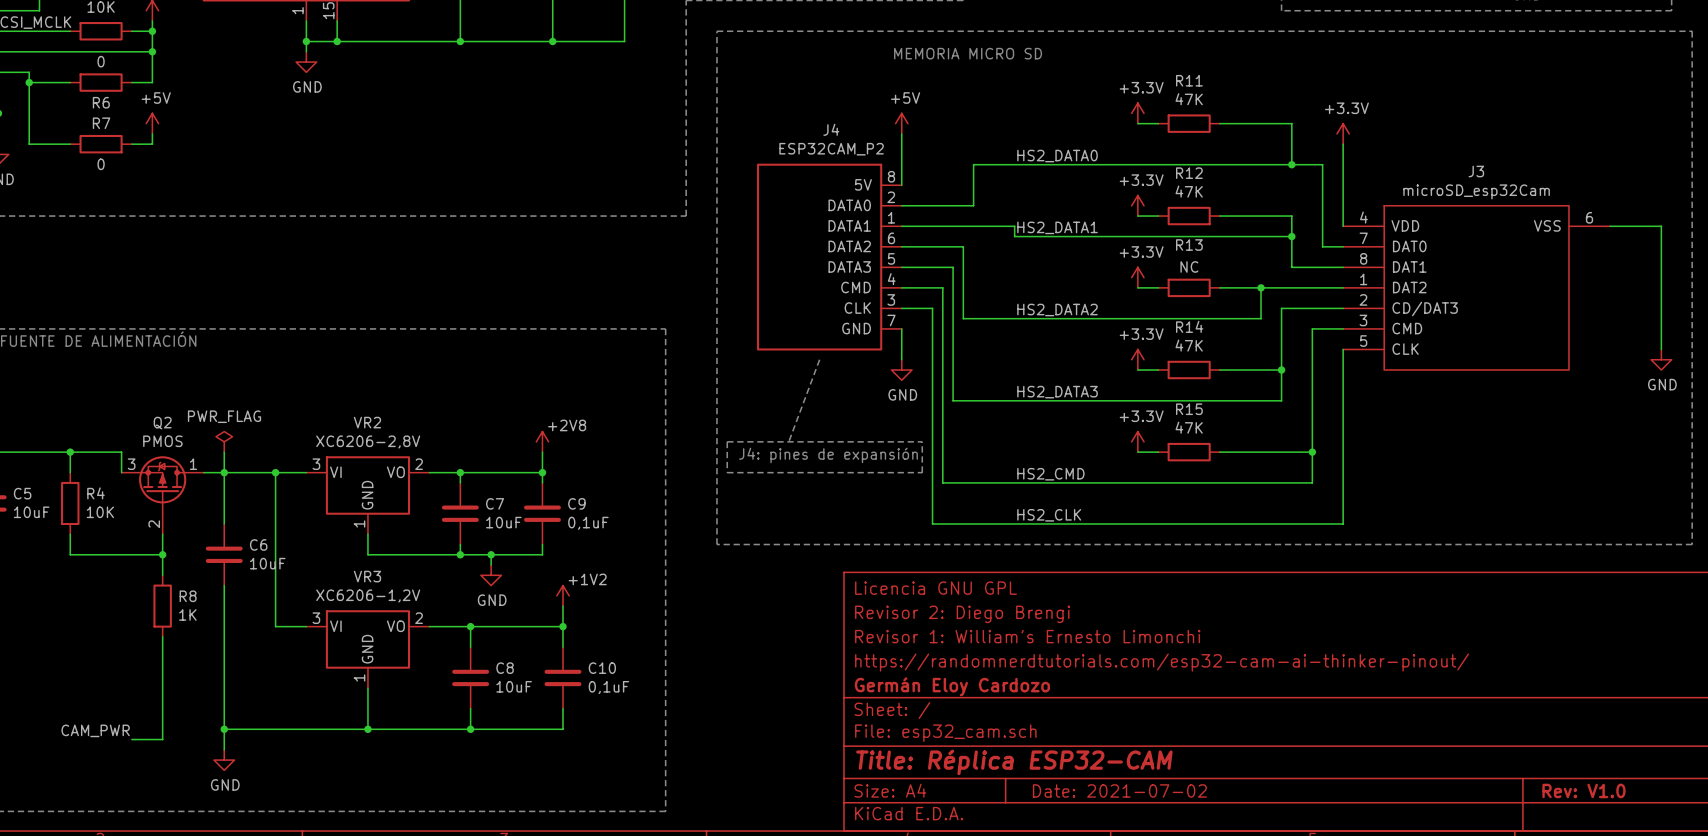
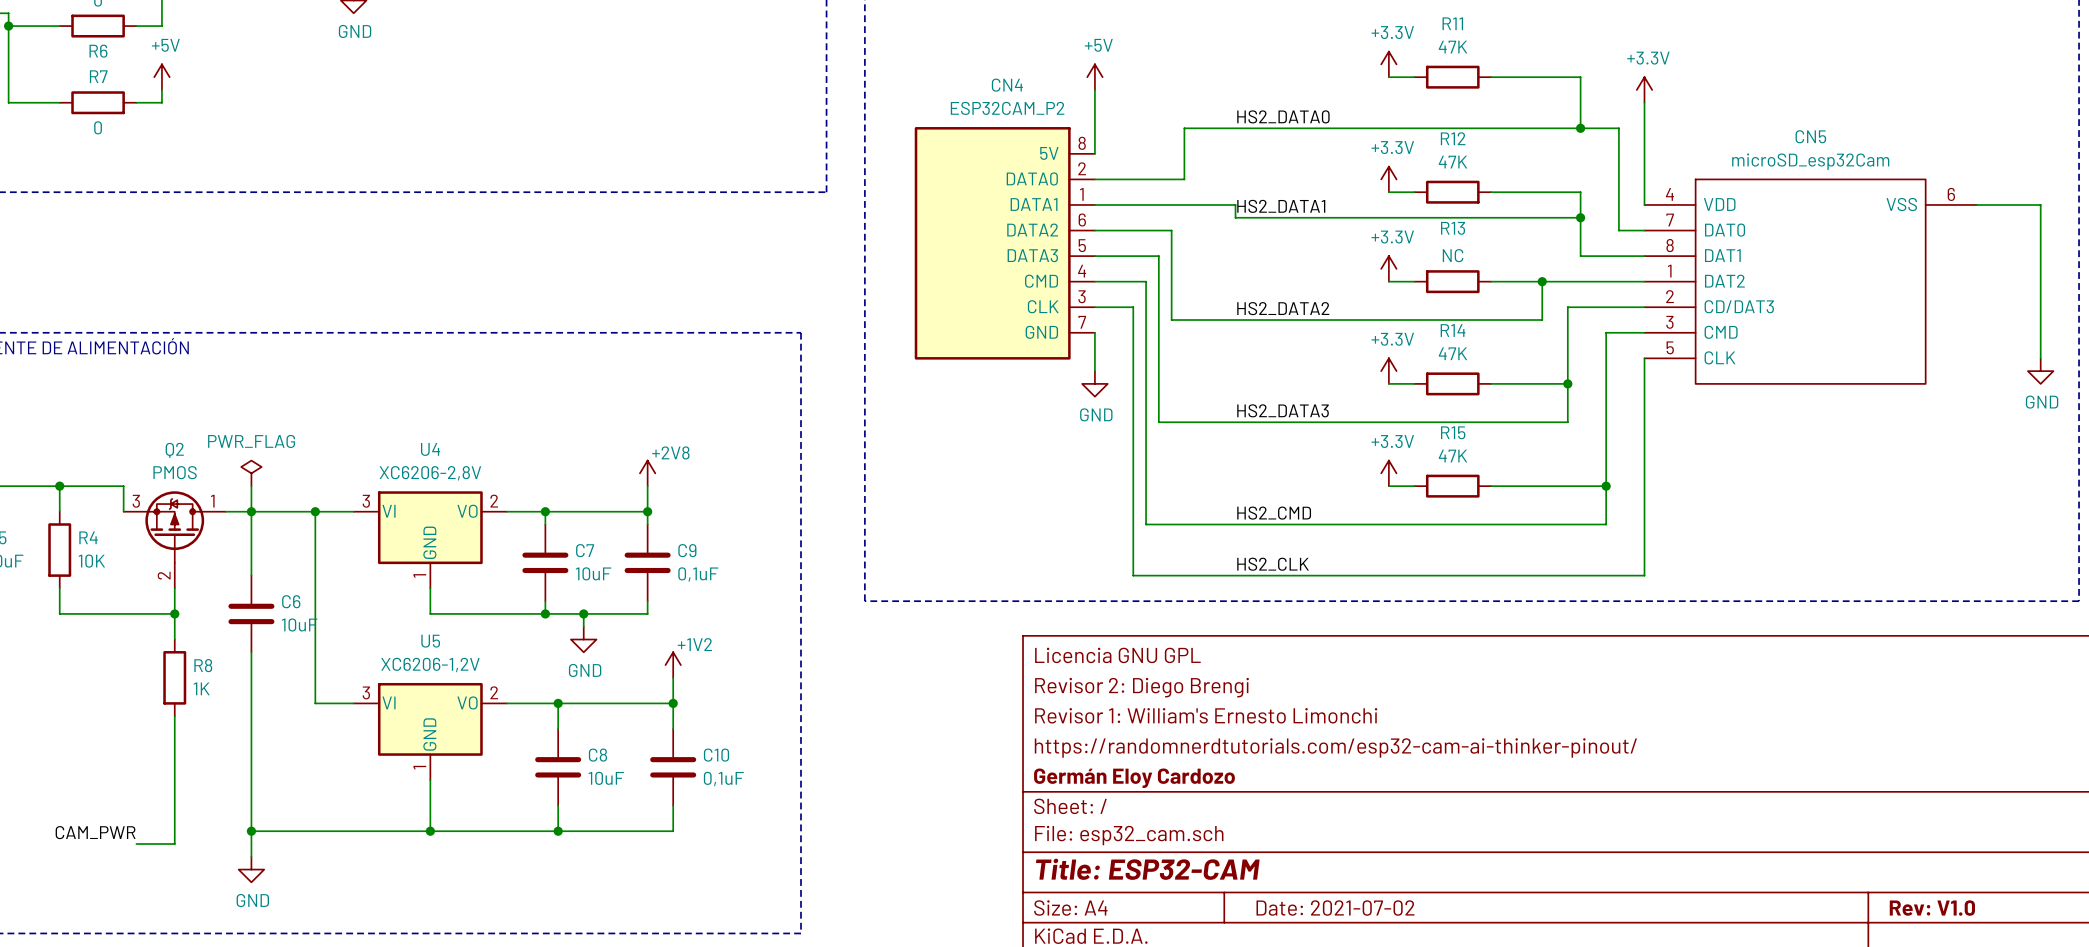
J4 name: J4 (831, 129) -> CN4 (1007, 85)
J3 name: J3 (1476, 171) -> CN5 (1810, 136)
line: (819, 359) (788, 441) -> none
VR2 name: VR2 (367, 422) -> U4 (430, 449)
line: (727, 441) (727, 472) (922, 472) (922, 441) (727, 441) -> none
text: J4: pines de expansión (828, 455) -> none
VR3 name: VR3 (367, 576) -> U5 (430, 641)
title block: Title: Réplica ESP32-CAM (1014, 762) -> Title: ESP32-CAM (1147, 869)

